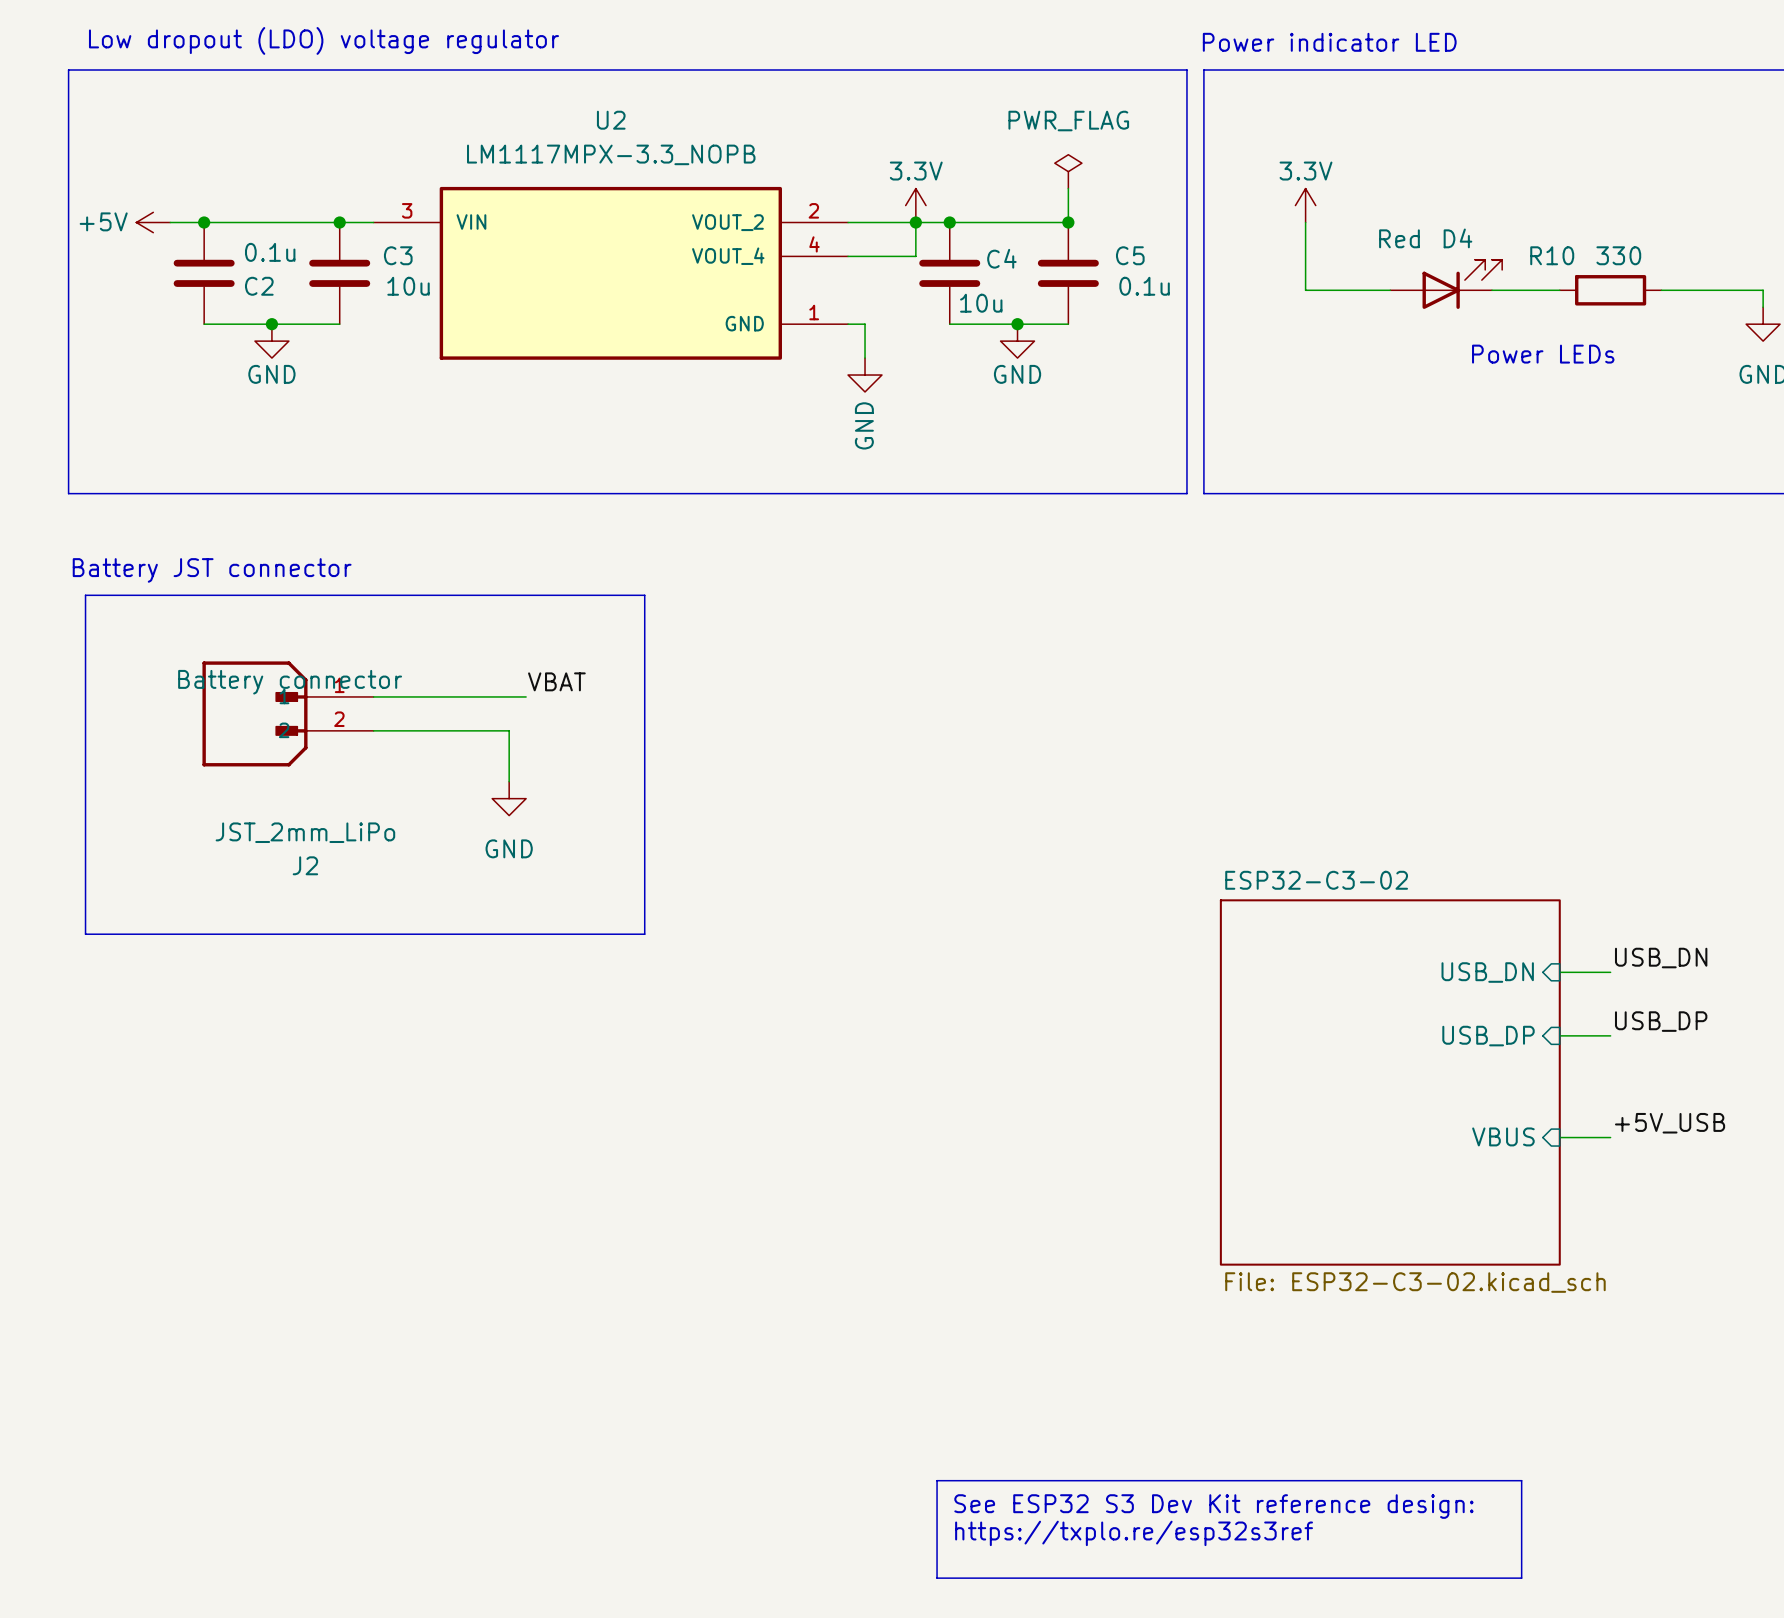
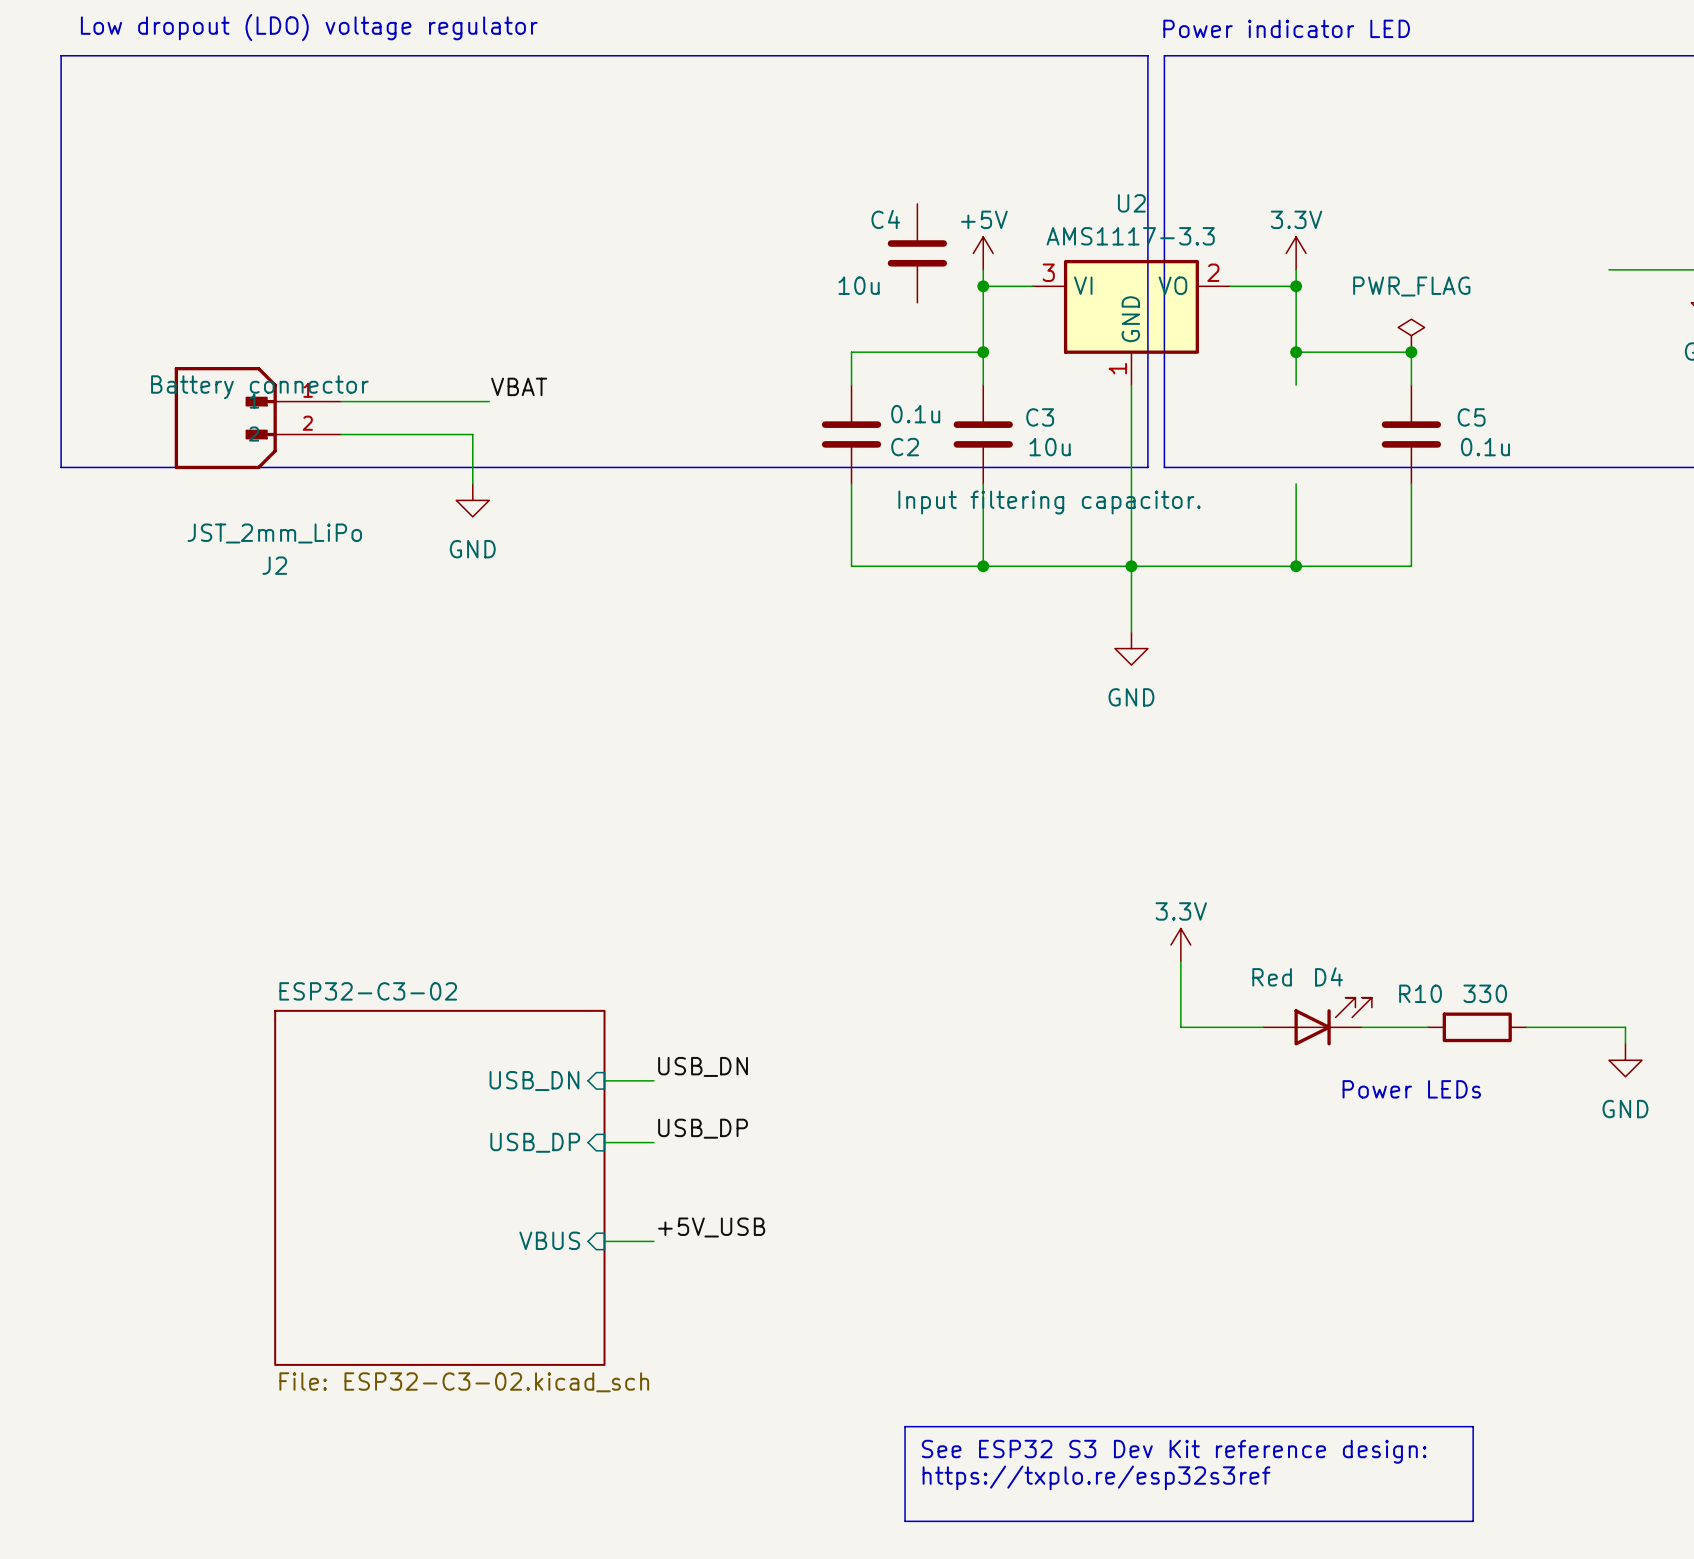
U2 name position: U2 (611, 120) -> U2 (1131, 203)
U2 value: LM1117MPX-3.3_NOPB (611, 154) -> AMS1117-3.3 (1130, 236)
power symbol: PWR_FLAG (1068, 171) -> none
U2 symbol: [373, 186, 849, 360] -> [1032, 259, 1231, 386]
wire: (1068, 188) (1068, 222) (848, 222) -> none
power symbol: 3.3V (915, 205) -> none
power symbol position: 3.3V (1305, 205) -> 3.3V (1296, 253)
power symbol: +5V (153, 222) -> none
wire: (170, 222) (373, 222) -> none
junction: (204, 222) -> none
junction: (339, 222) -> none
wire: (915, 222) (915, 256) (848, 256) -> none
junction: (915, 222) -> none
junction: (949, 222) -> none
junction: (1068, 222) -> none
wire: (1305, 222) (1305, 290) (1390, 290) -> none
C4 name position: C4 (1001, 258) -> C4 (885, 219)
C2 position: (204, 273) -> (851, 434)
C3 position: (339, 273) -> (983, 434)
power symbol: none -> +5V (983, 253)
C5 position: (1068, 273) -> (1411, 434)
D4 position: (1446, 284) -> (1317, 1021)
wire: none -> (983, 269) (983, 385)
wire: none -> (1296, 269) (1296, 385)
wire: (1491, 290) (1559, 290) -> (1230, 286) (1296, 286)
R10 position: (1610, 290) -> (1477, 1027)
C4 value position: 10u (981, 303) -> 10u (859, 285)
wire: none -> (983, 286) (1032, 286)
junction: none -> (1296, 286)
wire: (204, 324) (339, 324) -> none
junction: (271, 324) -> none
wire: (848, 324) (865, 324) (865, 358) -> none
wire: (949, 324) (1068, 324) -> none
junction position: (1017, 324) -> (983, 286)
power symbol: GND (271, 341) -> none
power symbol: GND (1017, 341) -> none
text: Power LEDs (1543, 354) -> none
power symbol: none -> PWR_FLAG (1411, 335)
power symbol: GND (865, 375) -> none
wire: none -> (983, 352) (851, 352) (851, 385)
junction: none -> (983, 352)
wire: none -> (1296, 352) (1411, 352) (1411, 385)
junction: none -> (1296, 352)
junction: none -> (1411, 352)
wire: none -> (1131, 385) (1131, 632)
wire: none -> (851, 483) (851, 566) (1411, 566) (1411, 483)
wire: none -> (983, 483) (983, 566)
wire: none -> (1296, 483) (1296, 566)
power symbol: none -> GND (472, 500)
C3 text: none -> Input filtering capacitor. (1049, 502)
text: Battery JST connector (212, 570) -> none
line: (85, 595) (644, 595) (644, 934) (85, 934) (85, 595) -> none
junction: none -> (983, 566)
junction: none -> (1131, 566)
junction: none -> (1296, 566)
power symbol: none -> GND (1131, 648)
label position: VBAT (556, 681) -> VBAT (519, 386)
wire: (373, 696) (526, 696) -> (341, 401) (489, 401)
J2 position: (288, 713) -> (257, 418)
wire: (373, 730) (509, 730) (509, 781) -> (341, 434) (472, 434) (472, 483)
power symbol: GND (509, 798) -> none
label: USB_DN (1661, 958) -> none
sheet pin: USB_DN (1487, 972) -> none
wire: (1559, 972) (1610, 972) -> none
power symbol: none -> 3.3V (1180, 945)
wire: none -> (1180, 961) (1180, 1027) (1263, 1027)
label: USB_DP (1661, 1021) -> none
wire: (1559, 1035) (1610, 1035) -> none
sheet pin: USB_DP (1488, 1036) -> none
wire: none -> (1361, 1027) (1427, 1027)
wire: none -> (1526, 1027) (1625, 1027) (1625, 1043)
sheet ESP32-C3-02 position: (1390, 1082) -> (439, 1187)
power symbol: none -> GND (1625, 1060)
label: none -> USB_DN (703, 1066)
label: +5V_USB (1670, 1123) -> none
wire: none -> (604, 1080) (653, 1080)
sheet pin: none -> USB_DN (534, 1081)
text: none -> Power LEDs (1411, 1089)
sheet pin: VBUS (1503, 1136) -> none
wire: (1559, 1137) (1610, 1137) -> none
label: none -> USB_DP (703, 1128)
sheet pin: none -> USB_DP (535, 1142)
wire: none -> (604, 1142) (653, 1142)
label: none -> +5V_USB (711, 1227)
sheet pin: none -> VBUS (549, 1240)
wire: none -> (604, 1241) (653, 1241)

